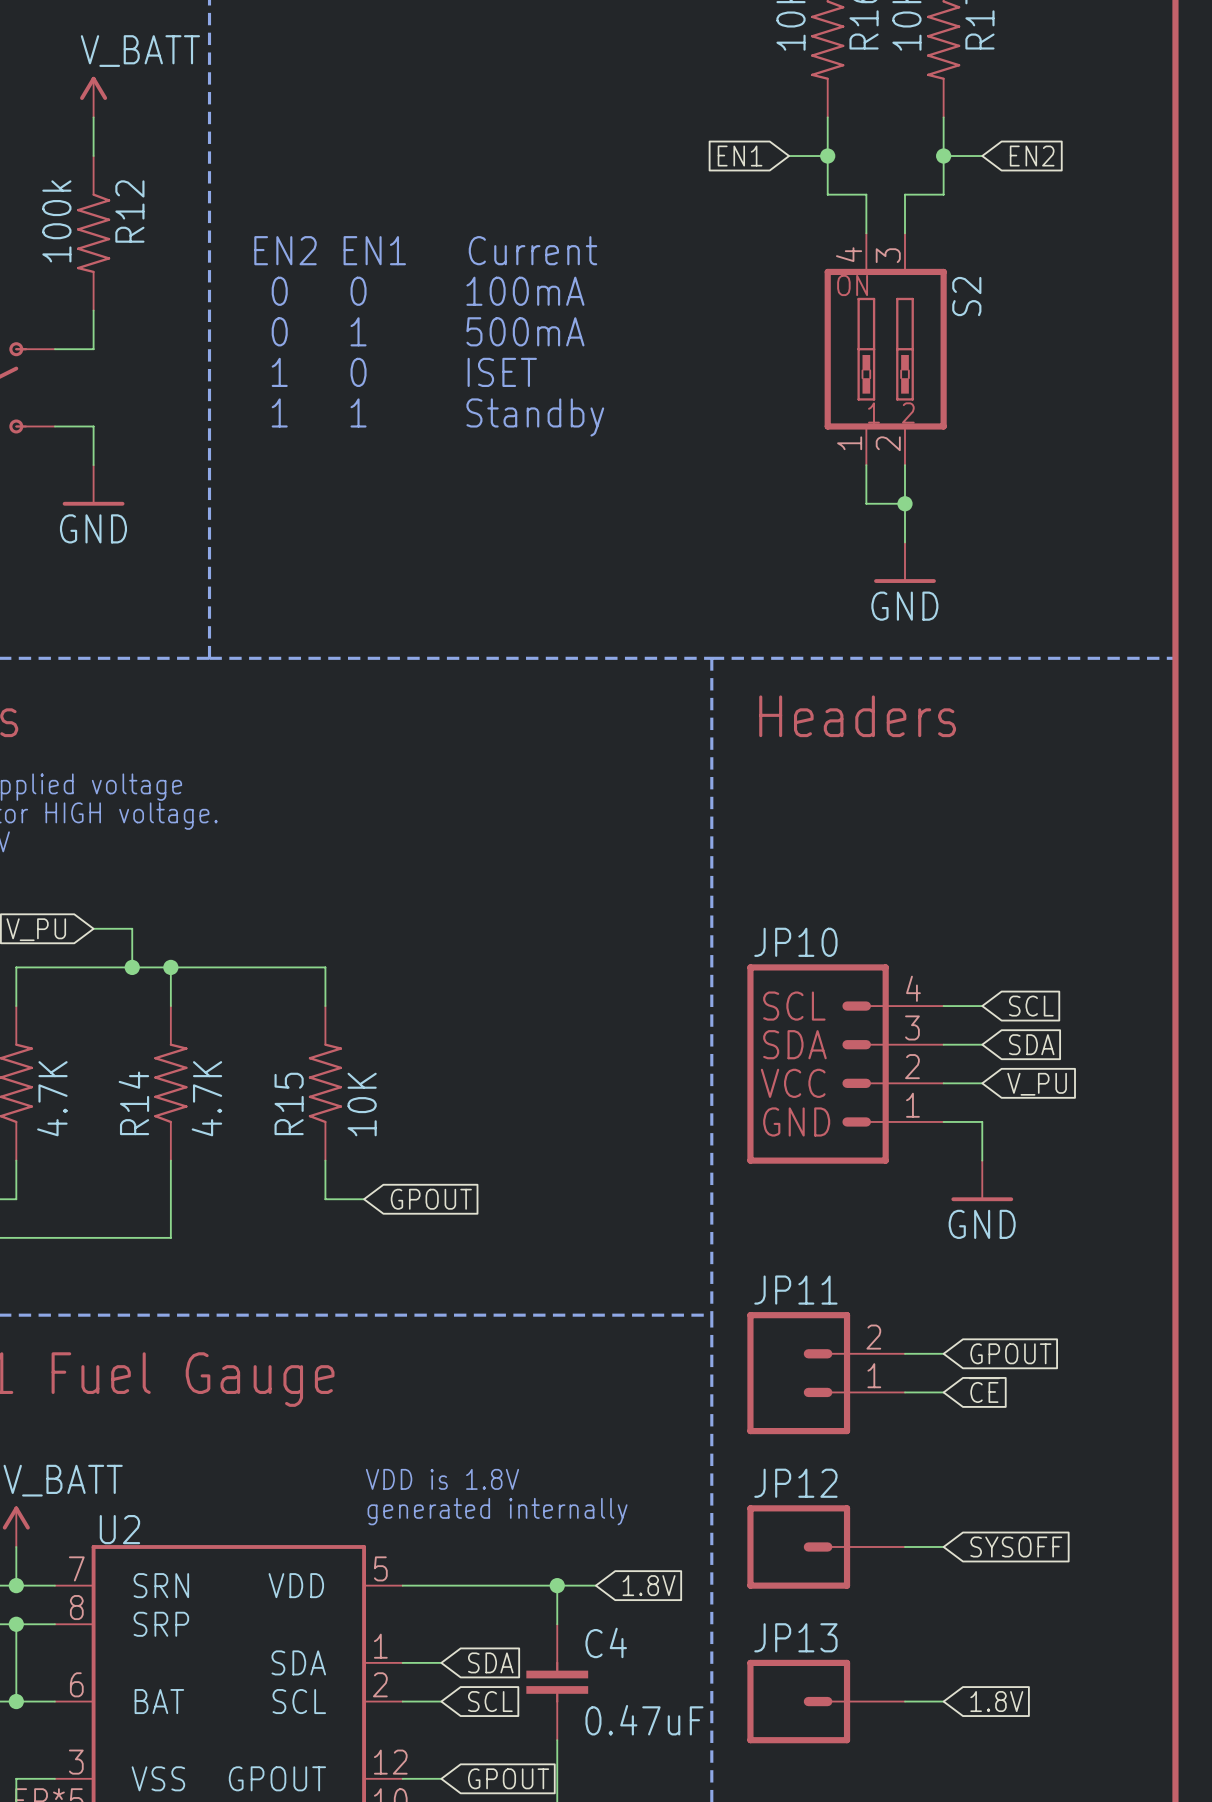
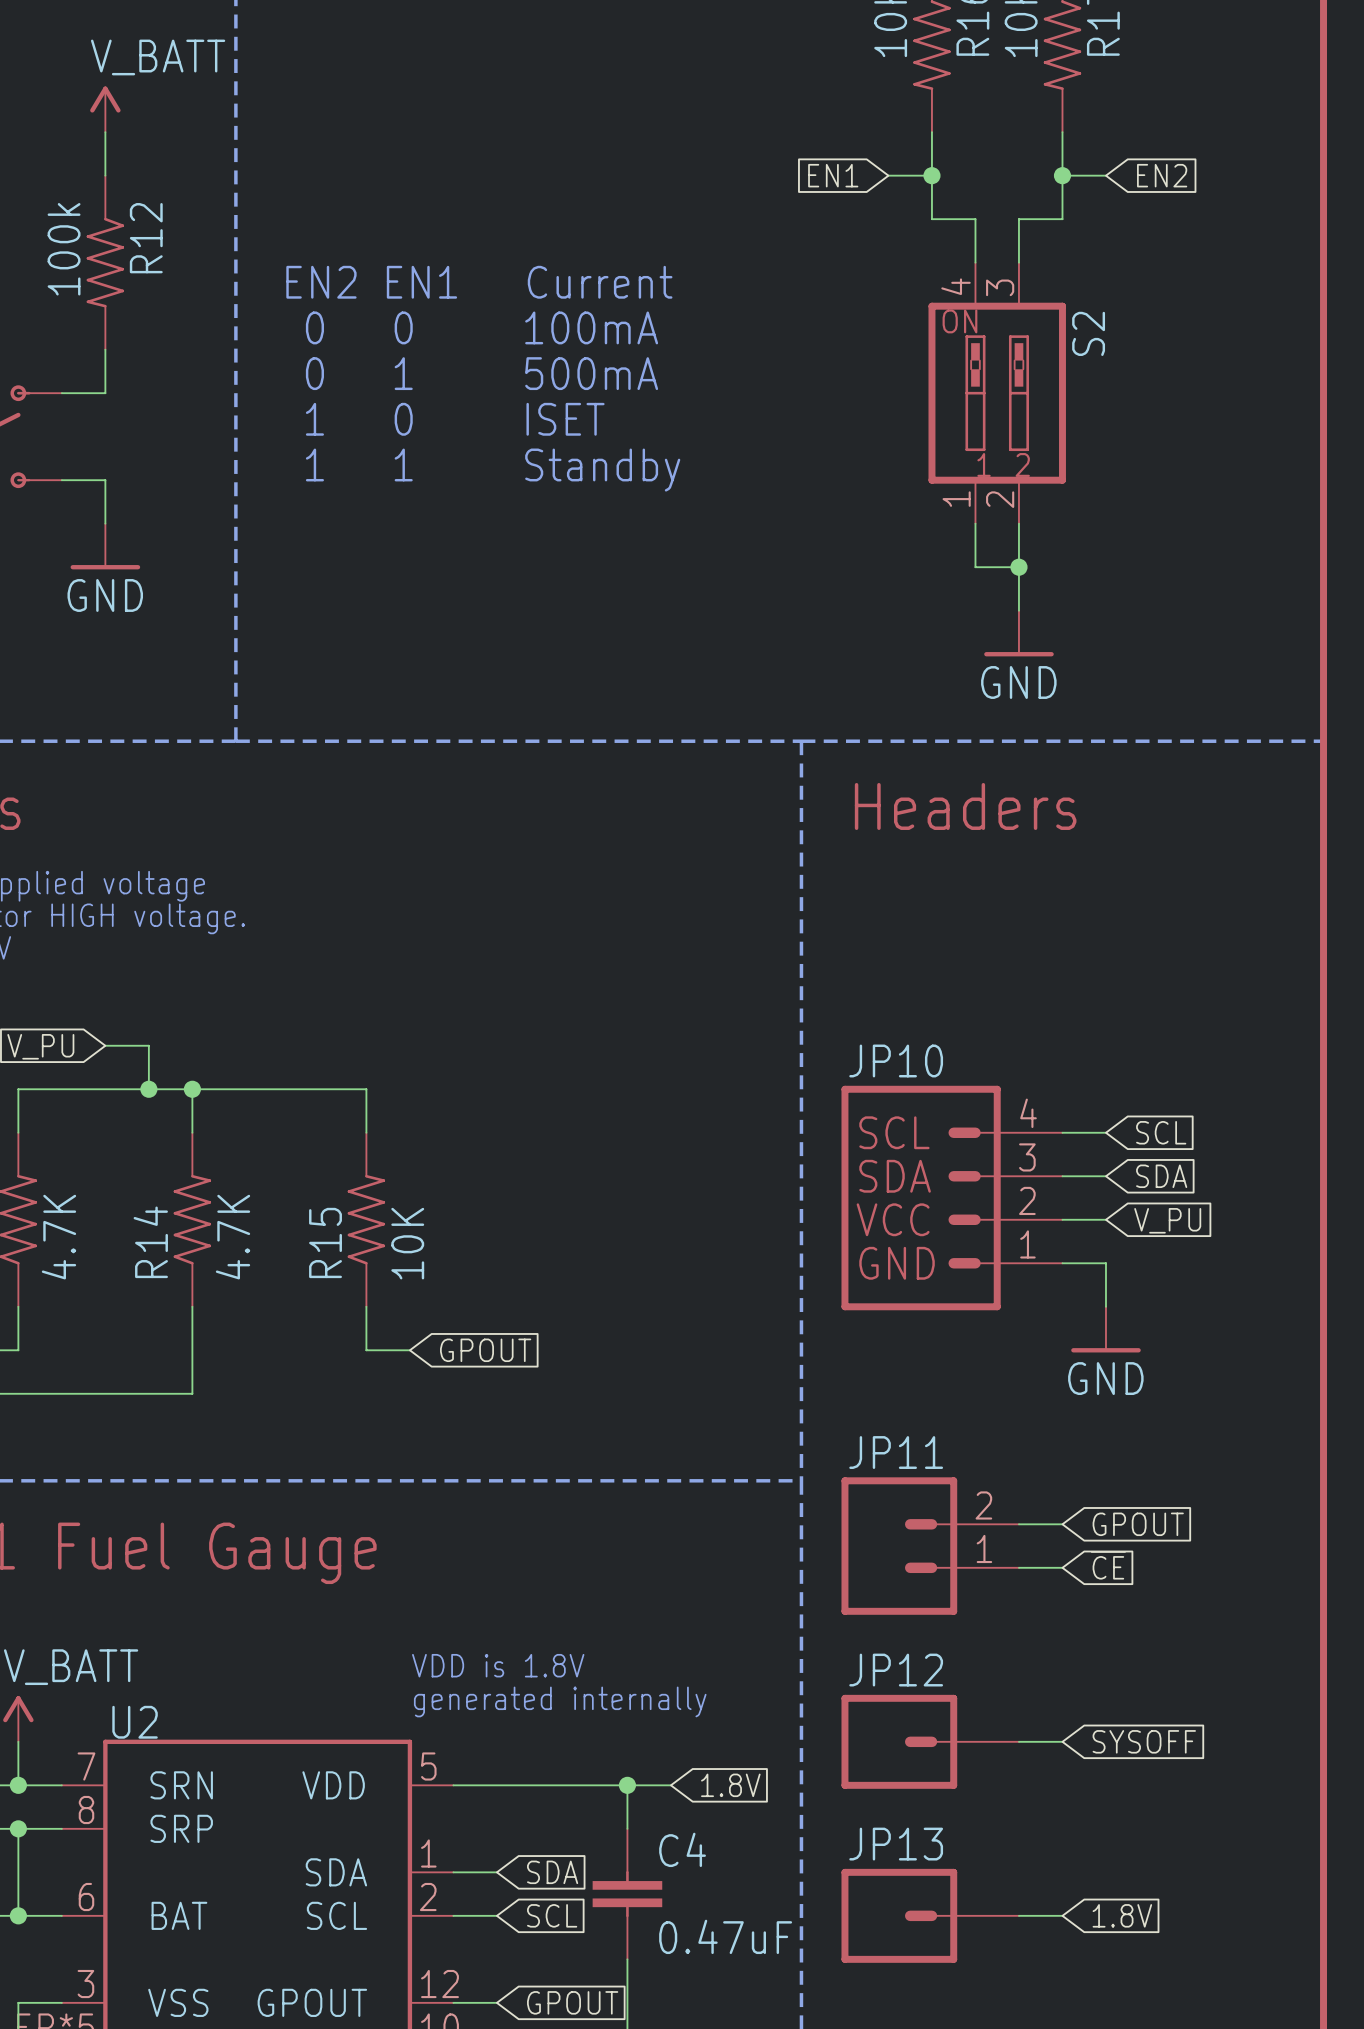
S2 symbol: [824, 233, 947, 466] -> [928, 262, 1066, 524]

